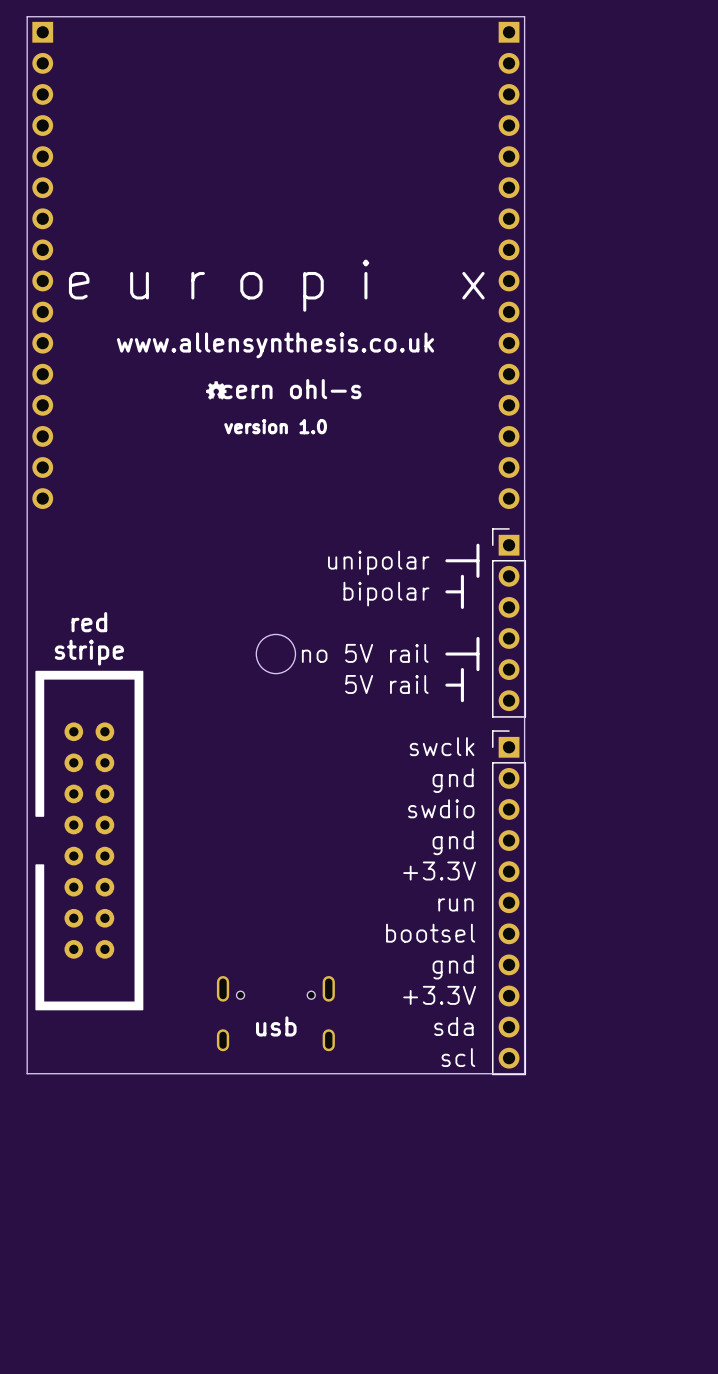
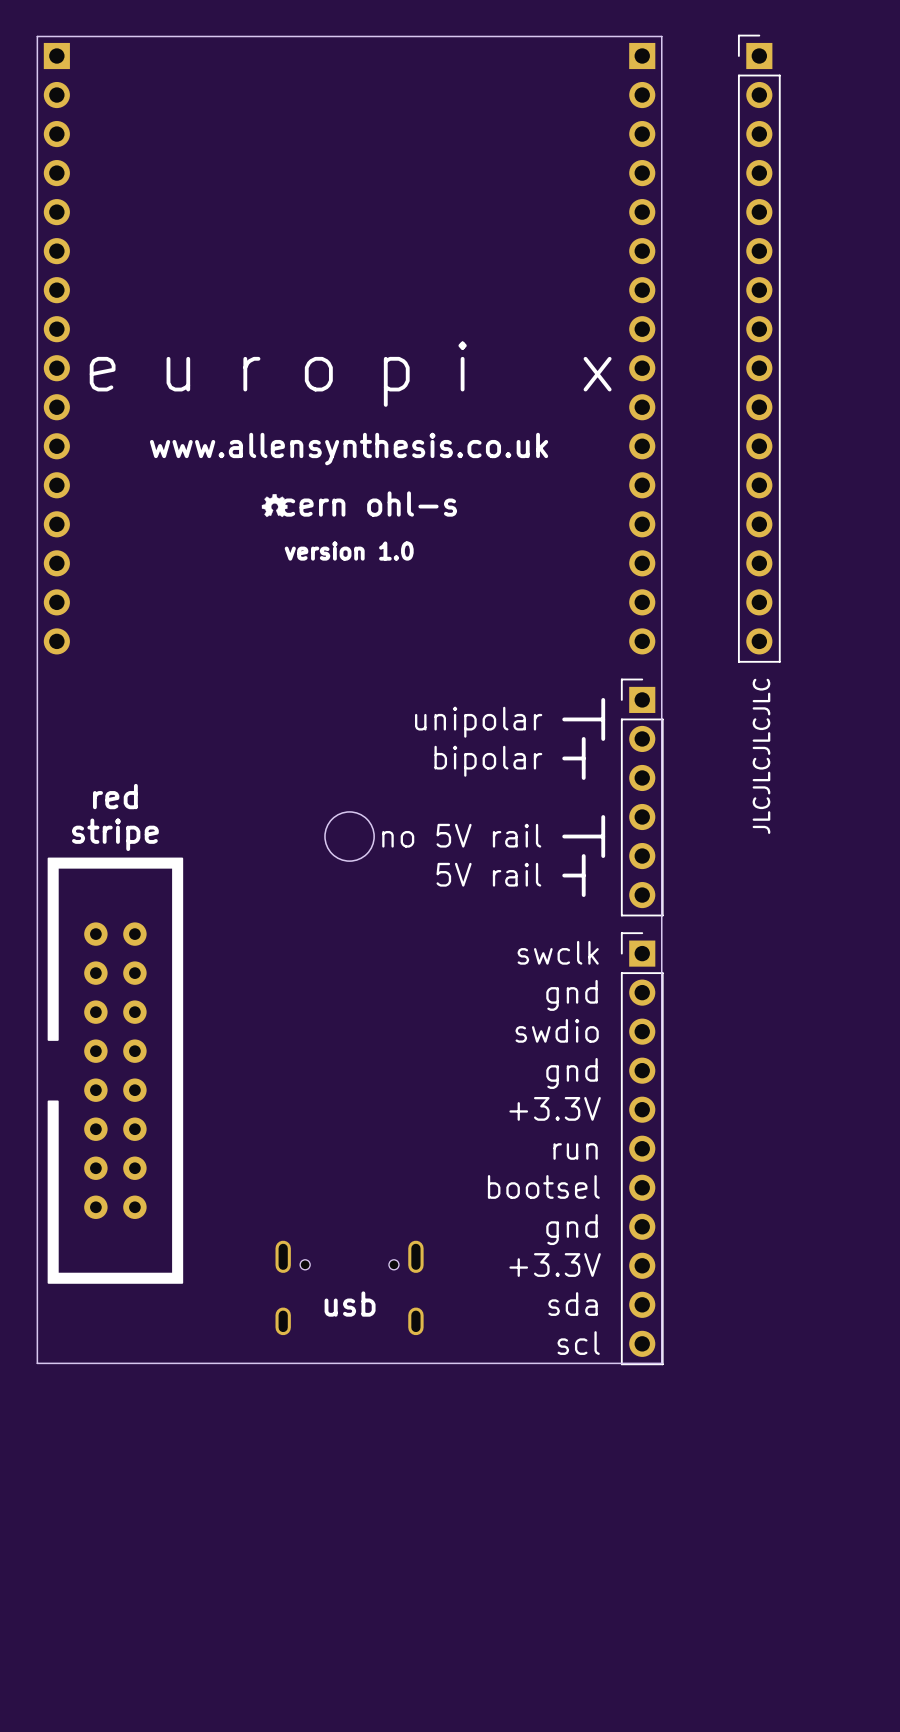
part: none -> (759, 348)
text: none -> JLCJLCJLCJLC (761, 756)

